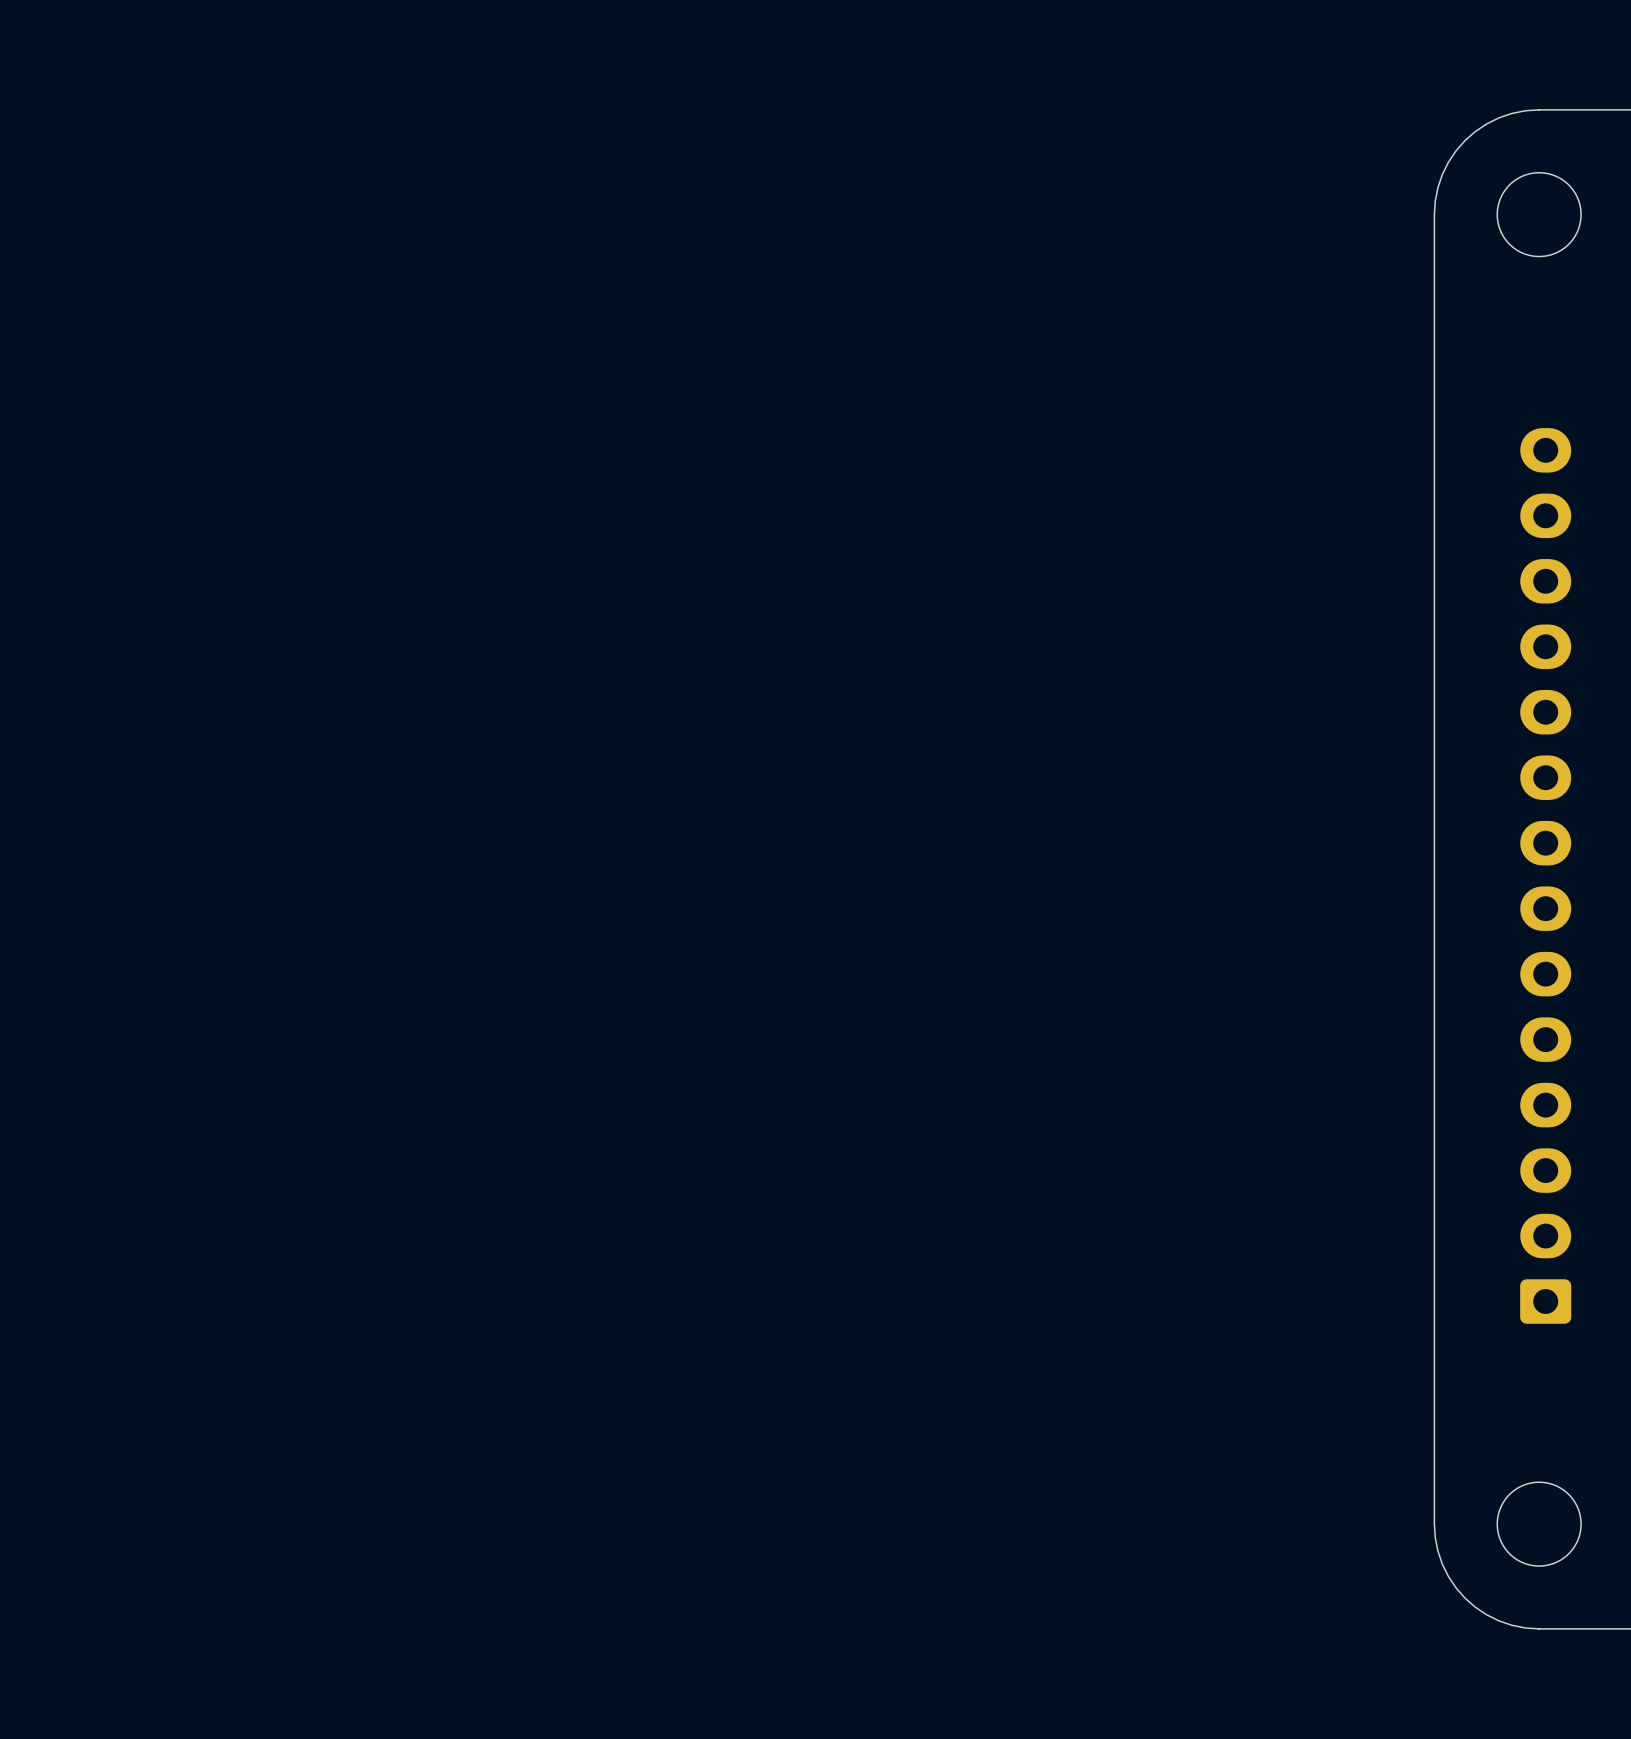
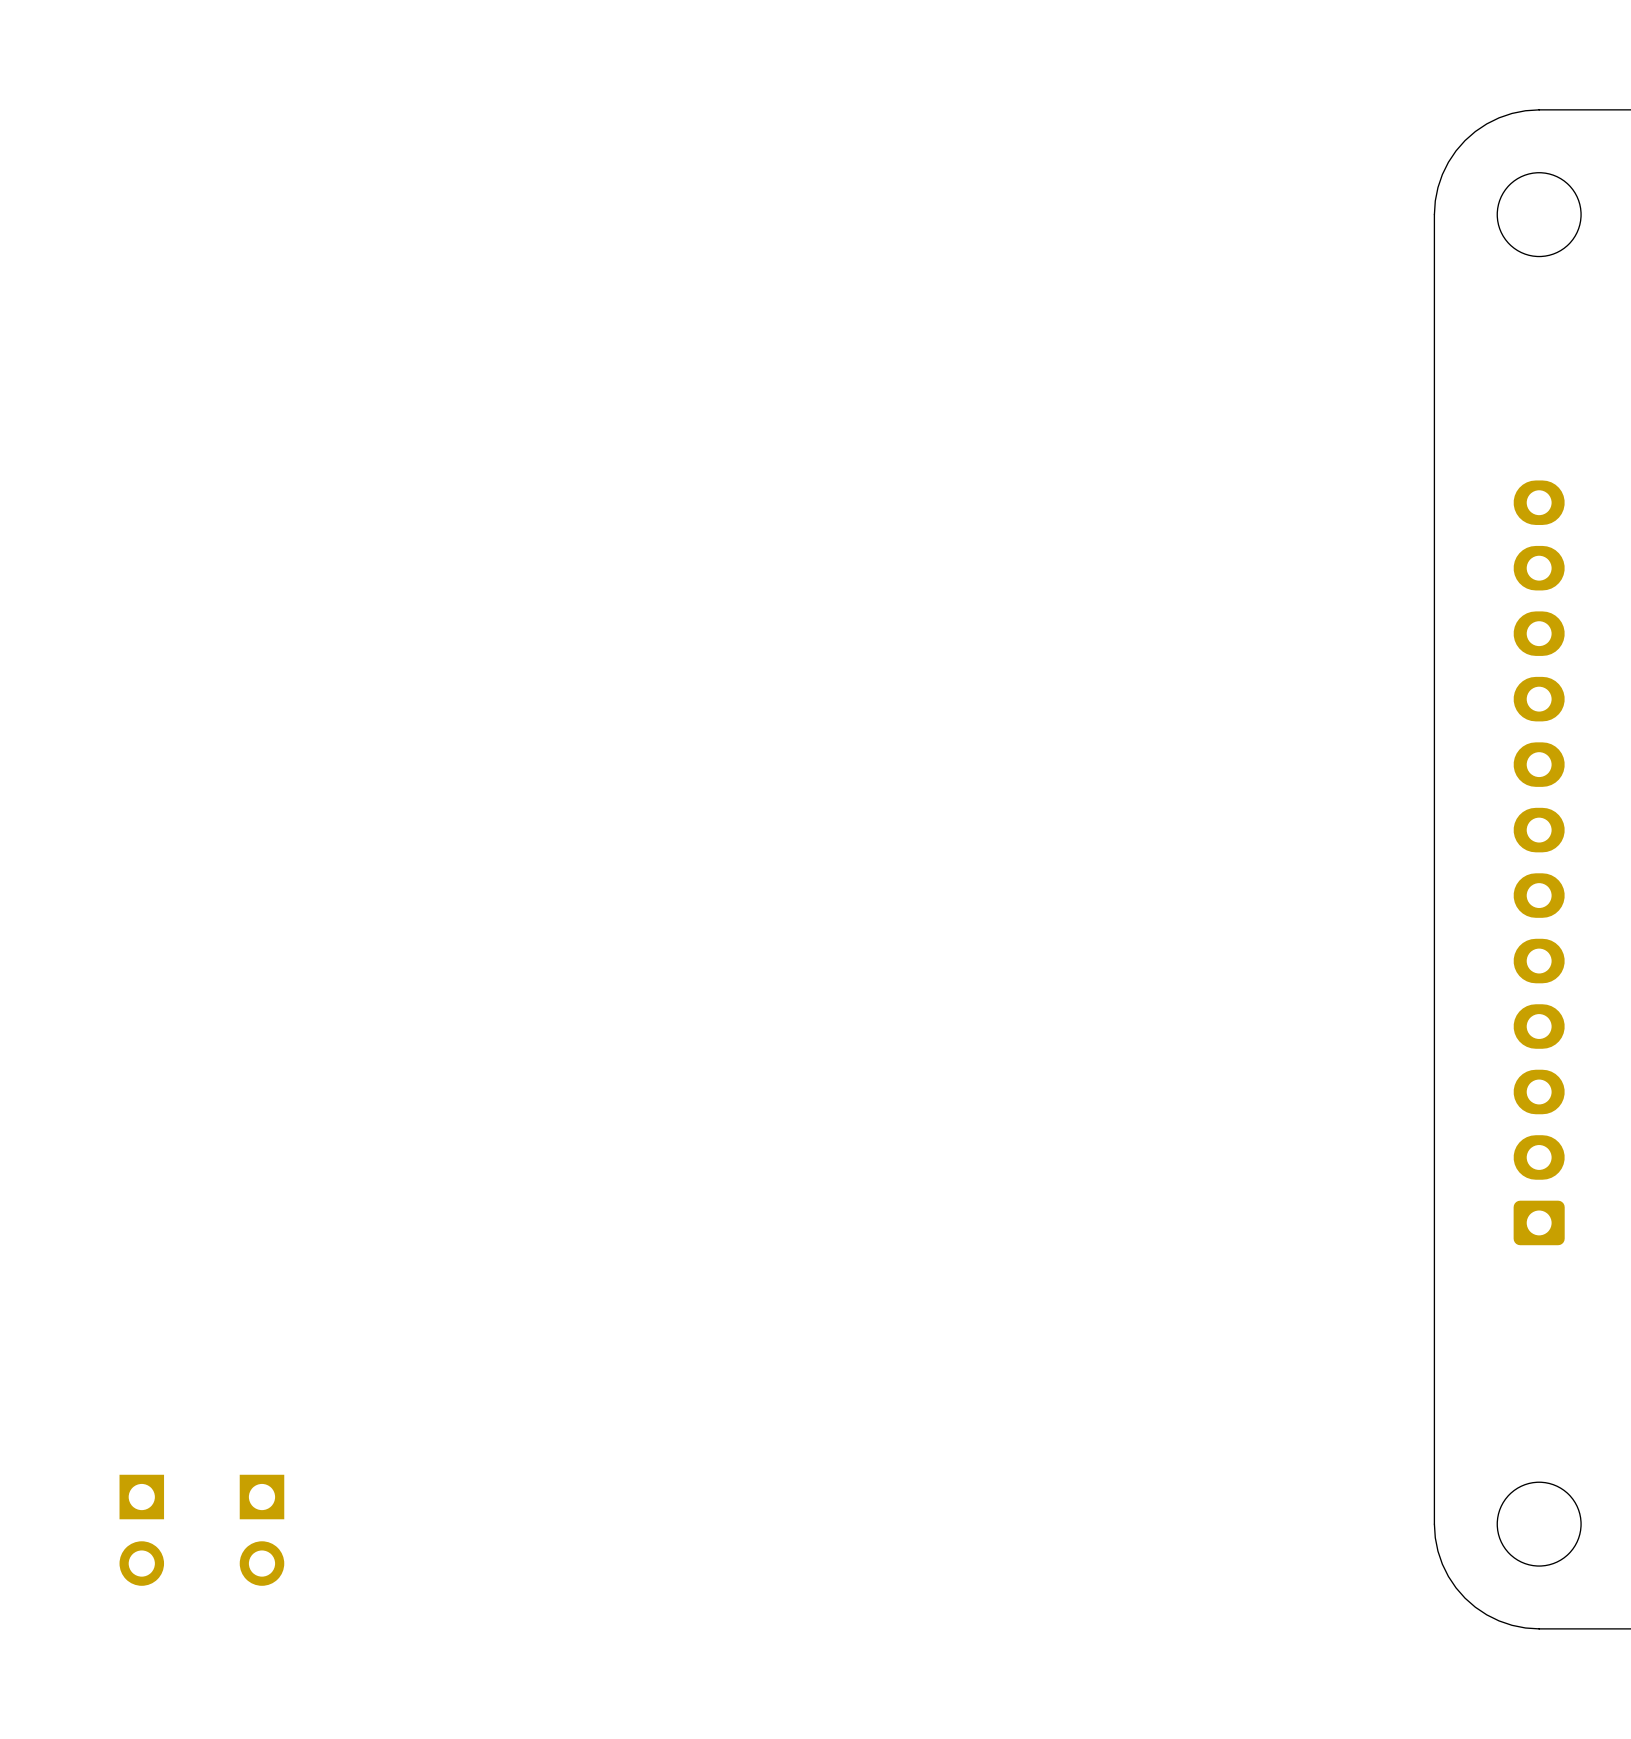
part footprint: [1520, 428, 1572, 1324] -> [1513, 480, 1565, 1246]
part: none -> (141, 1530)
part: none -> (261, 1530)

